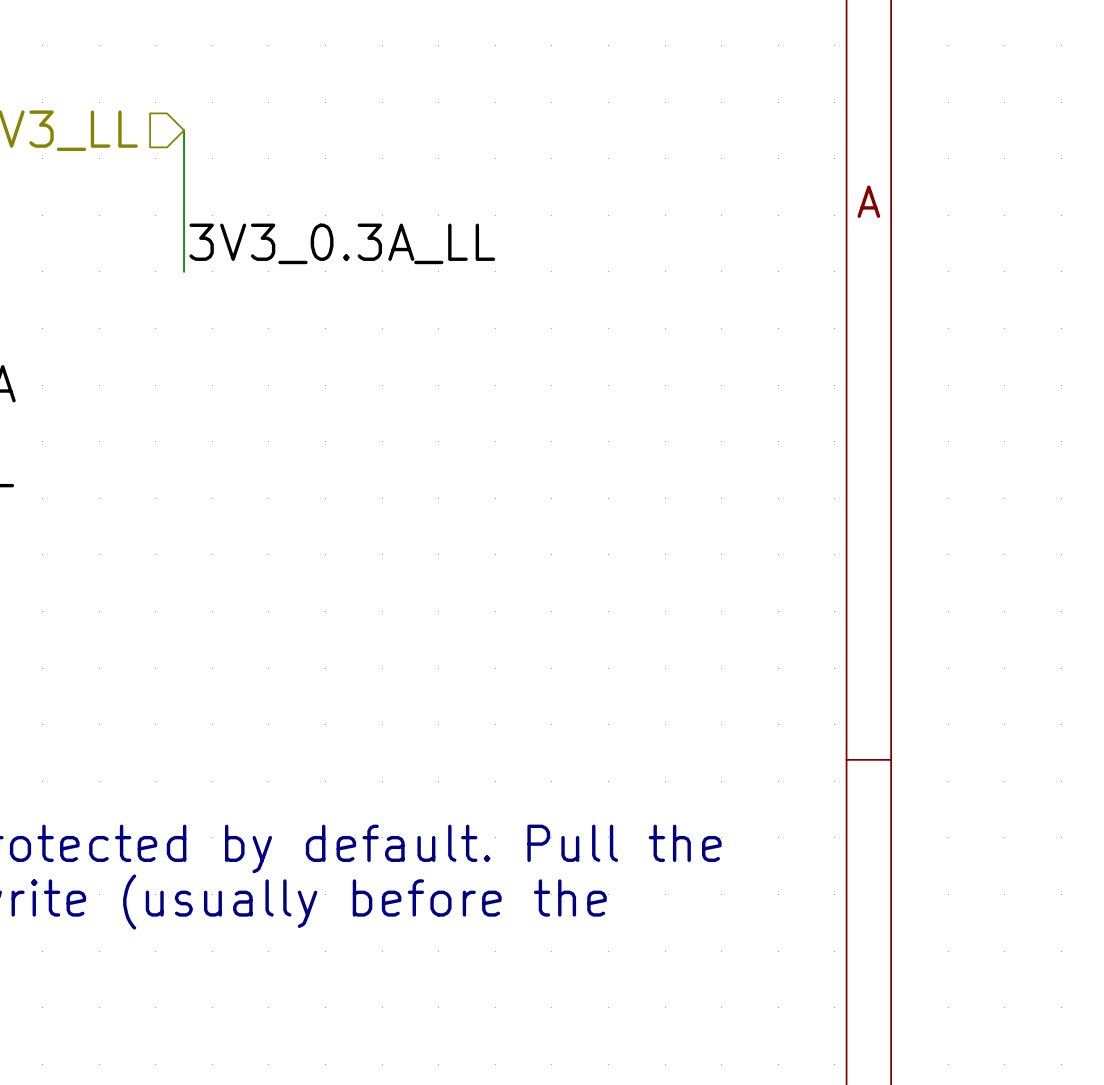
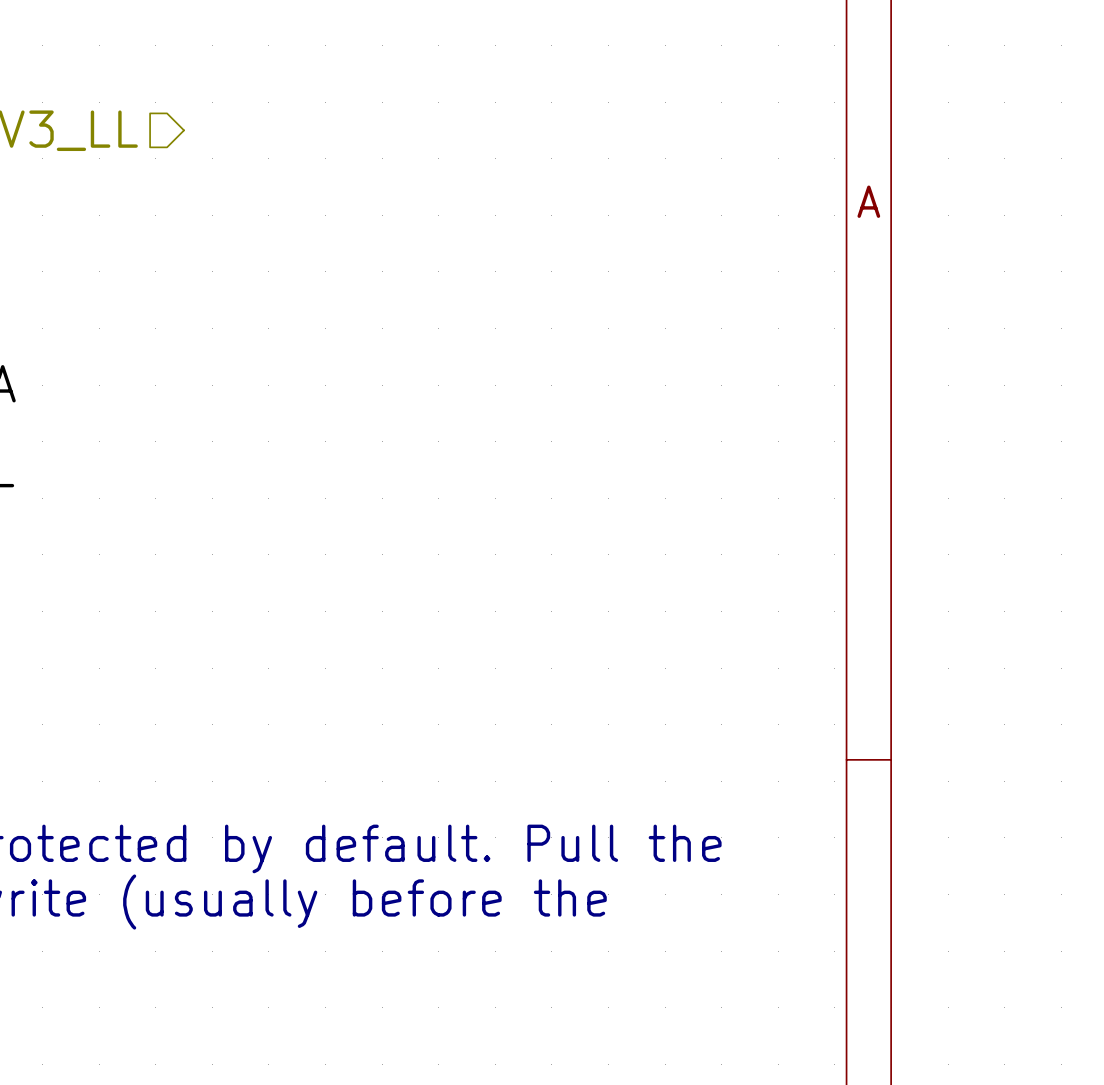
wire: (184, 130) (184, 271) -> none
label: 3V3_0.3A_LL (342, 243) -> none

